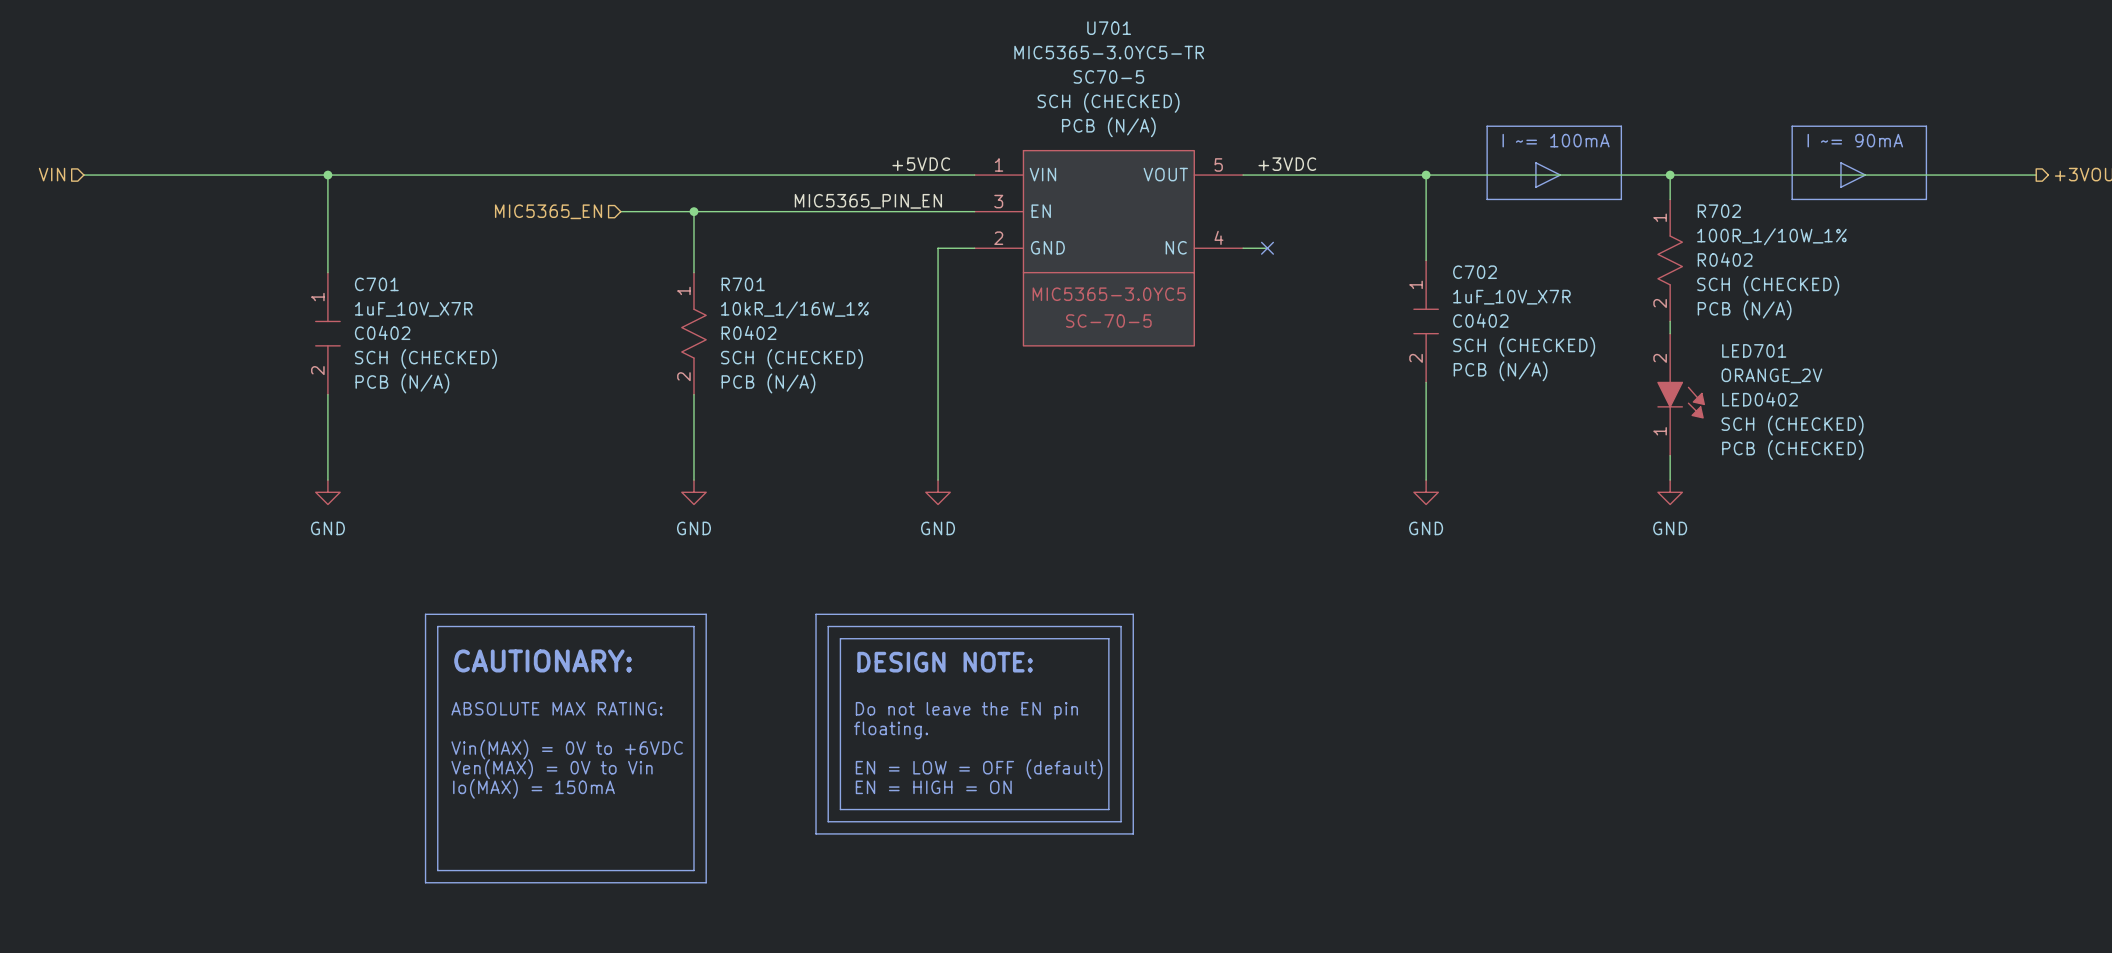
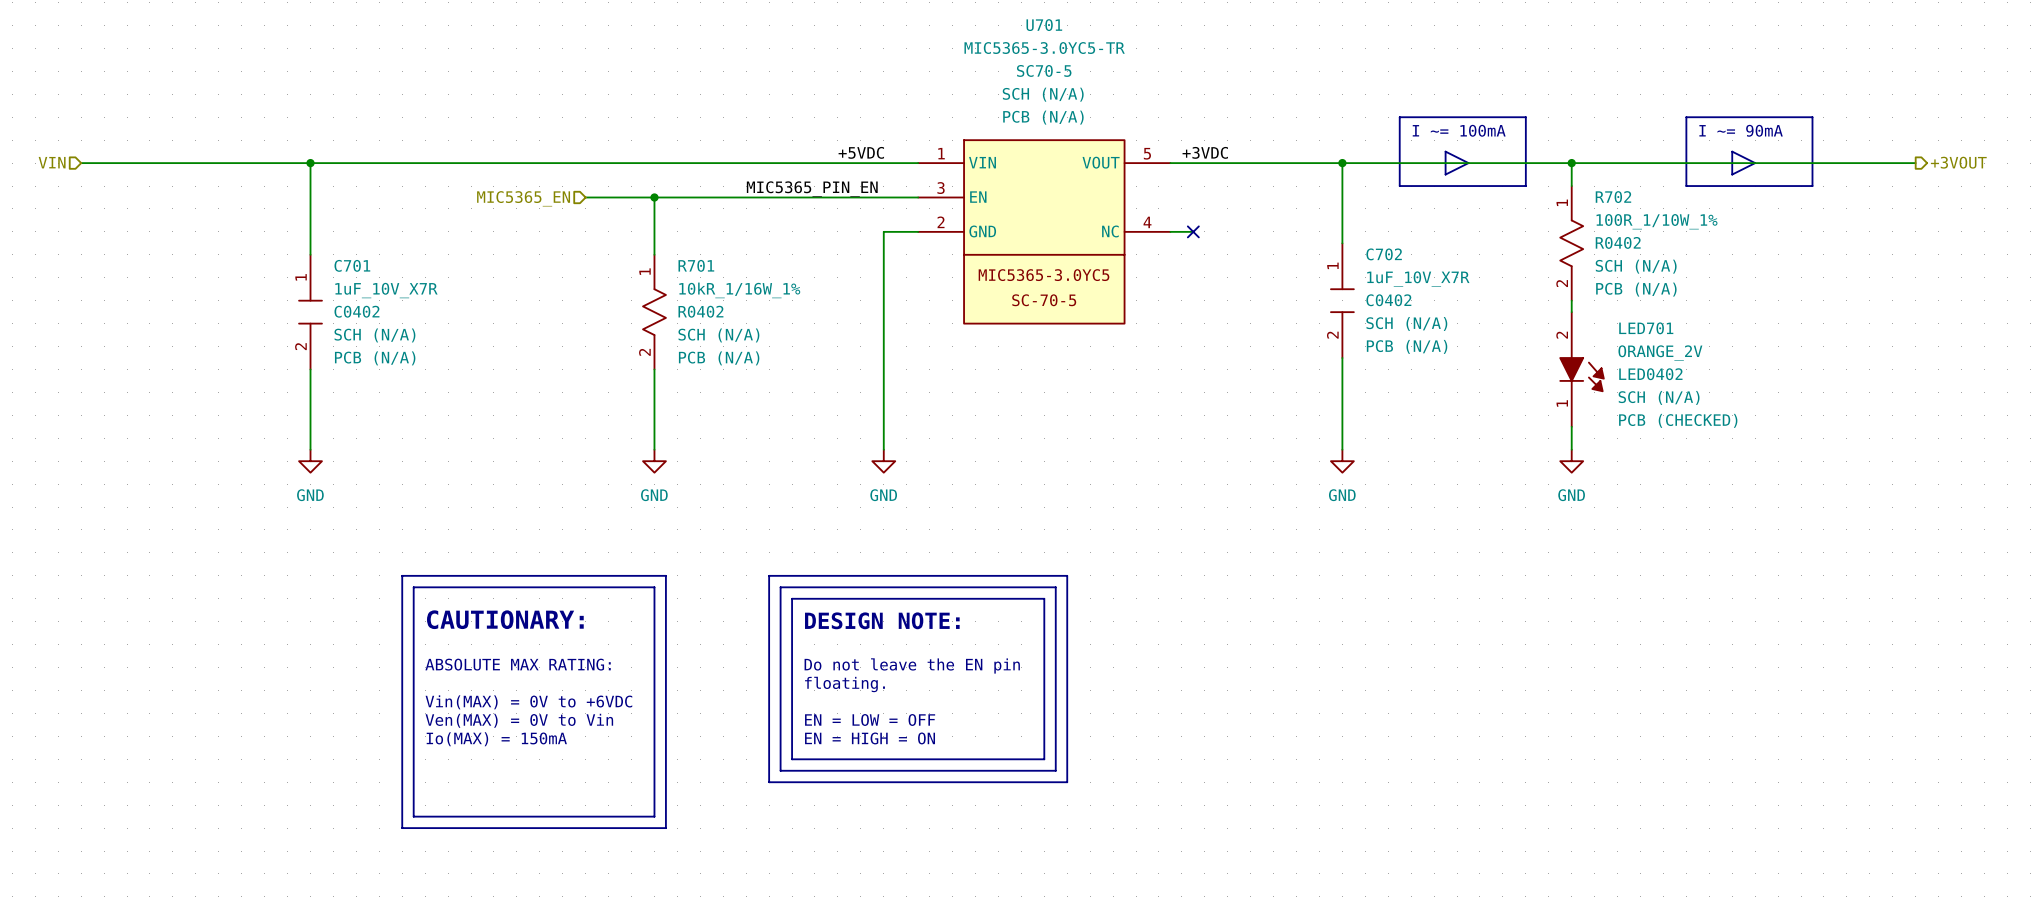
U701 text: SCH (CHECKED) (1108, 102) -> SCH (N/A) (1043, 94)
R702 text: SCH (CHECKED) (1768, 285) -> SCH (N/A) (1636, 266)
C702 text: SCH (CHECKED) (1524, 346) -> SCH (N/A) (1406, 323)
C701 text: SCH (CHECKED) (425, 359) -> SCH (N/A) (374, 335)
R701 text: SCH (CHECKED) (791, 359) -> SCH (N/A) (718, 335)
LED701 text: SCH (CHECKED) (1792, 425) -> SCH (N/A) (1659, 397)
text: EN = LOW = OFF (default) (979, 769) -> EN = LOW = OFF (870, 719)

